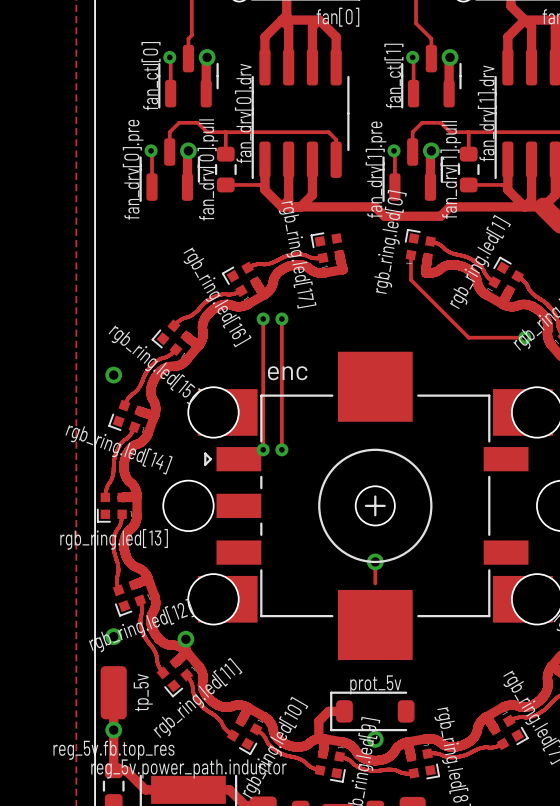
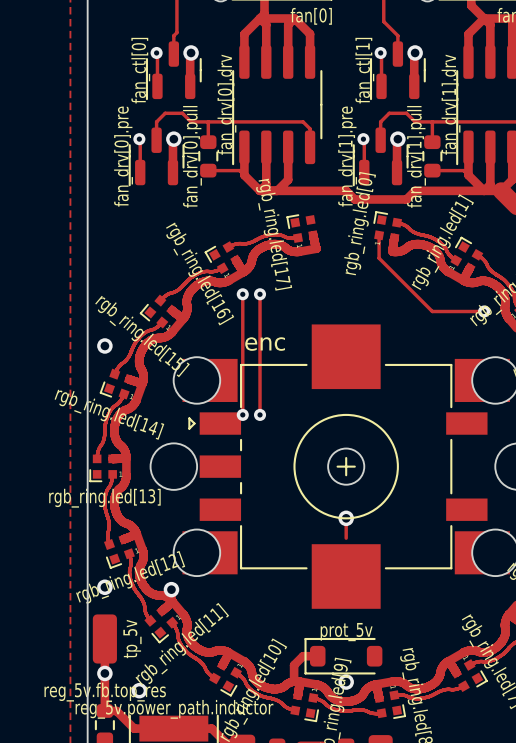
via: none -> (139, 690)

